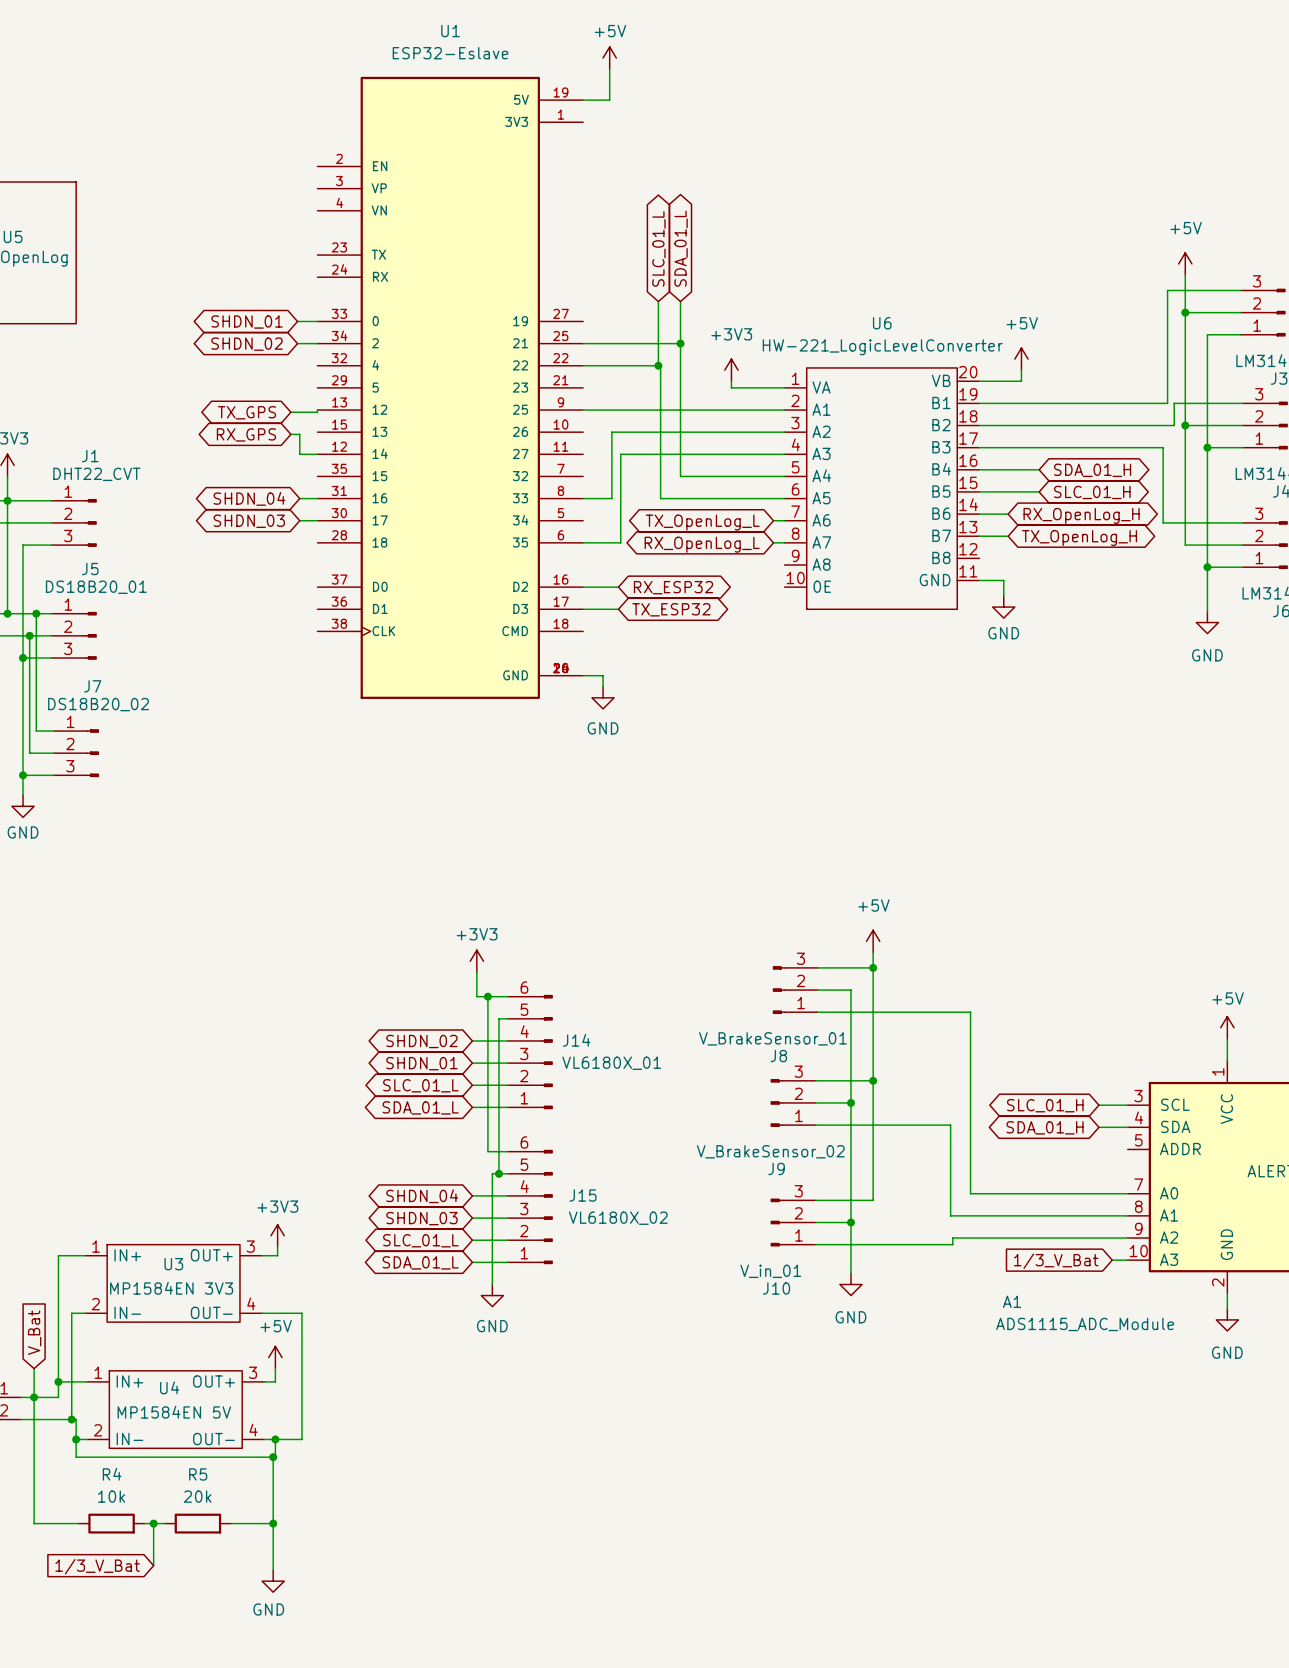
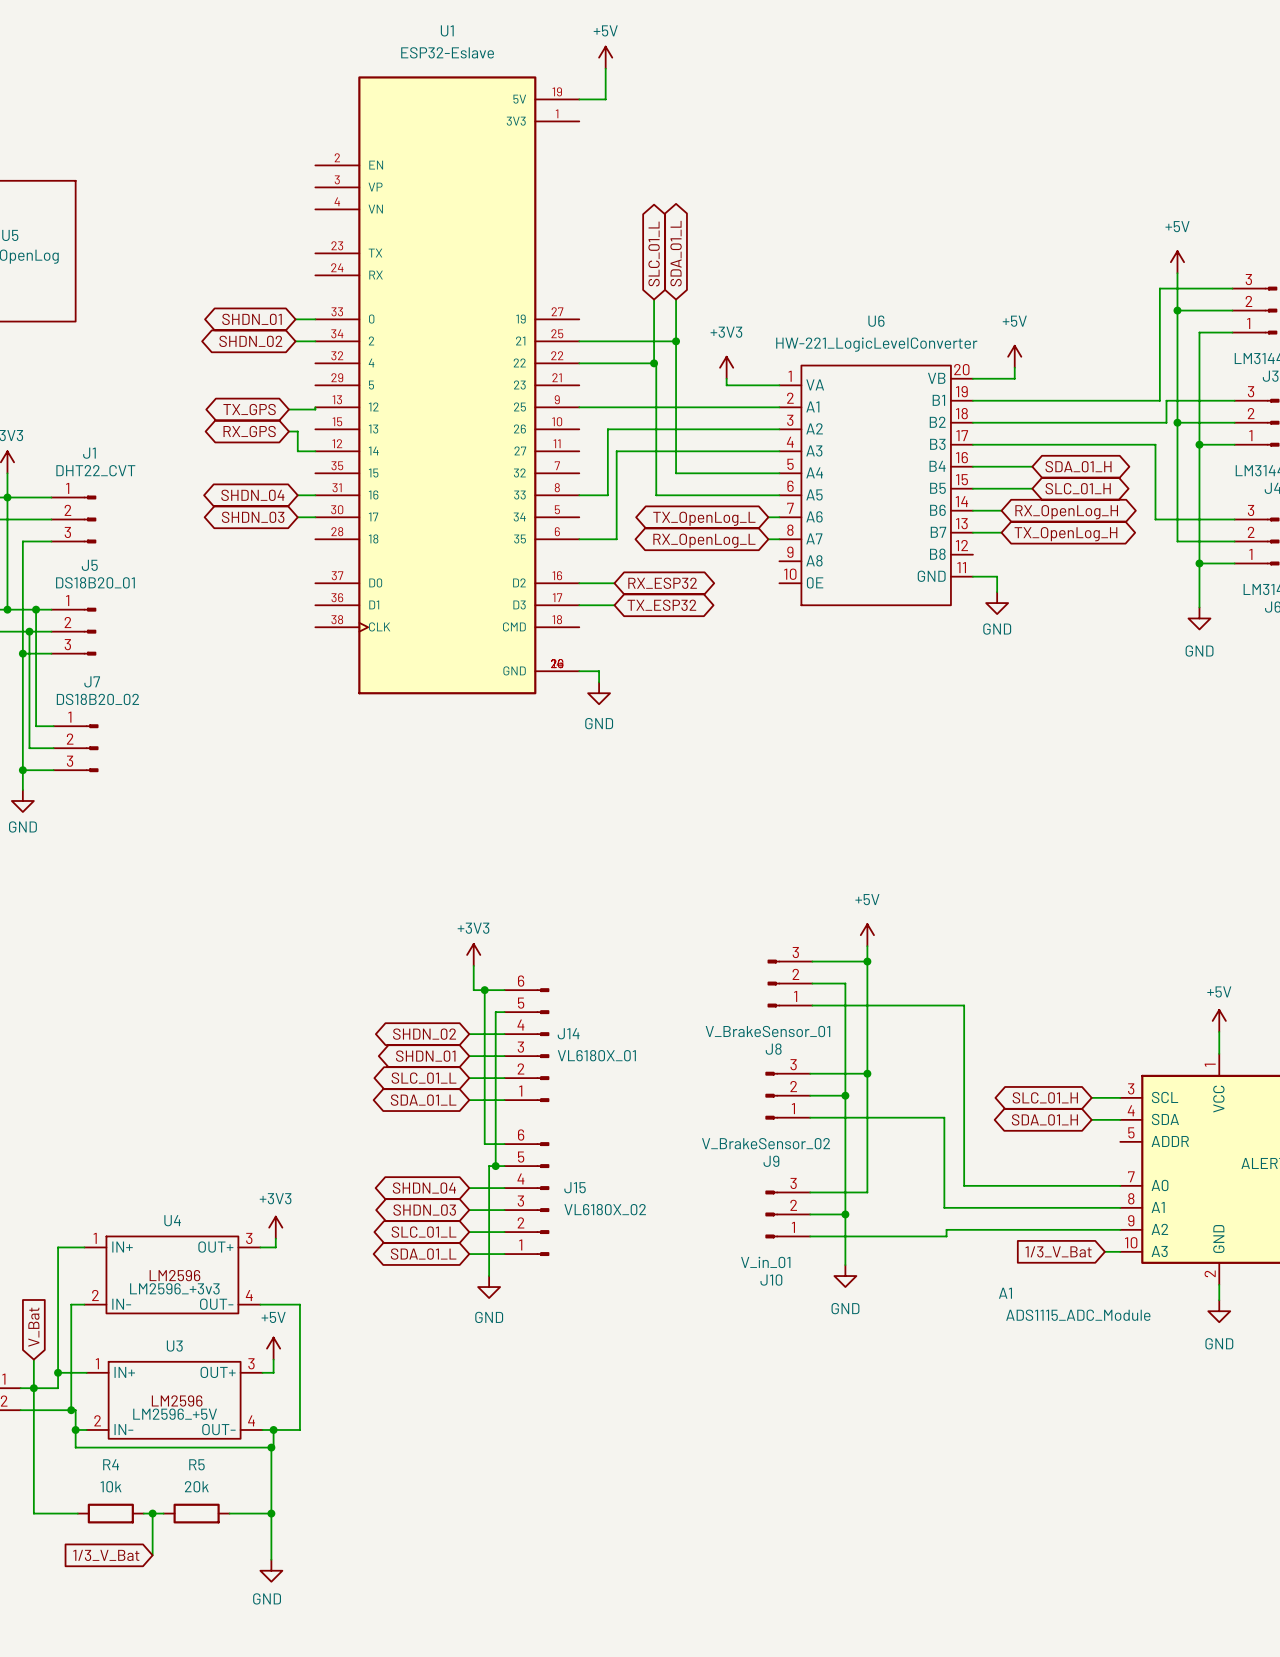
U3 name position: U3 (173, 1264) -> U3 (174, 1346)
U3 position: (173, 1283) -> (174, 1400)
U4 text: none -> LM2596 (174, 1275)
U3 value: MP1584EN 3V3 (171, 1288) -> LM2596_+5V (175, 1414)
U4 name position: U4 (169, 1387) -> U4 (172, 1220)
U4 position: (175, 1409) -> (172, 1274)
U3 text: none -> LM2596 (177, 1400)
U4 value: MP1584EN 5V (174, 1412) -> LM2596_+3v3 (174, 1288)

